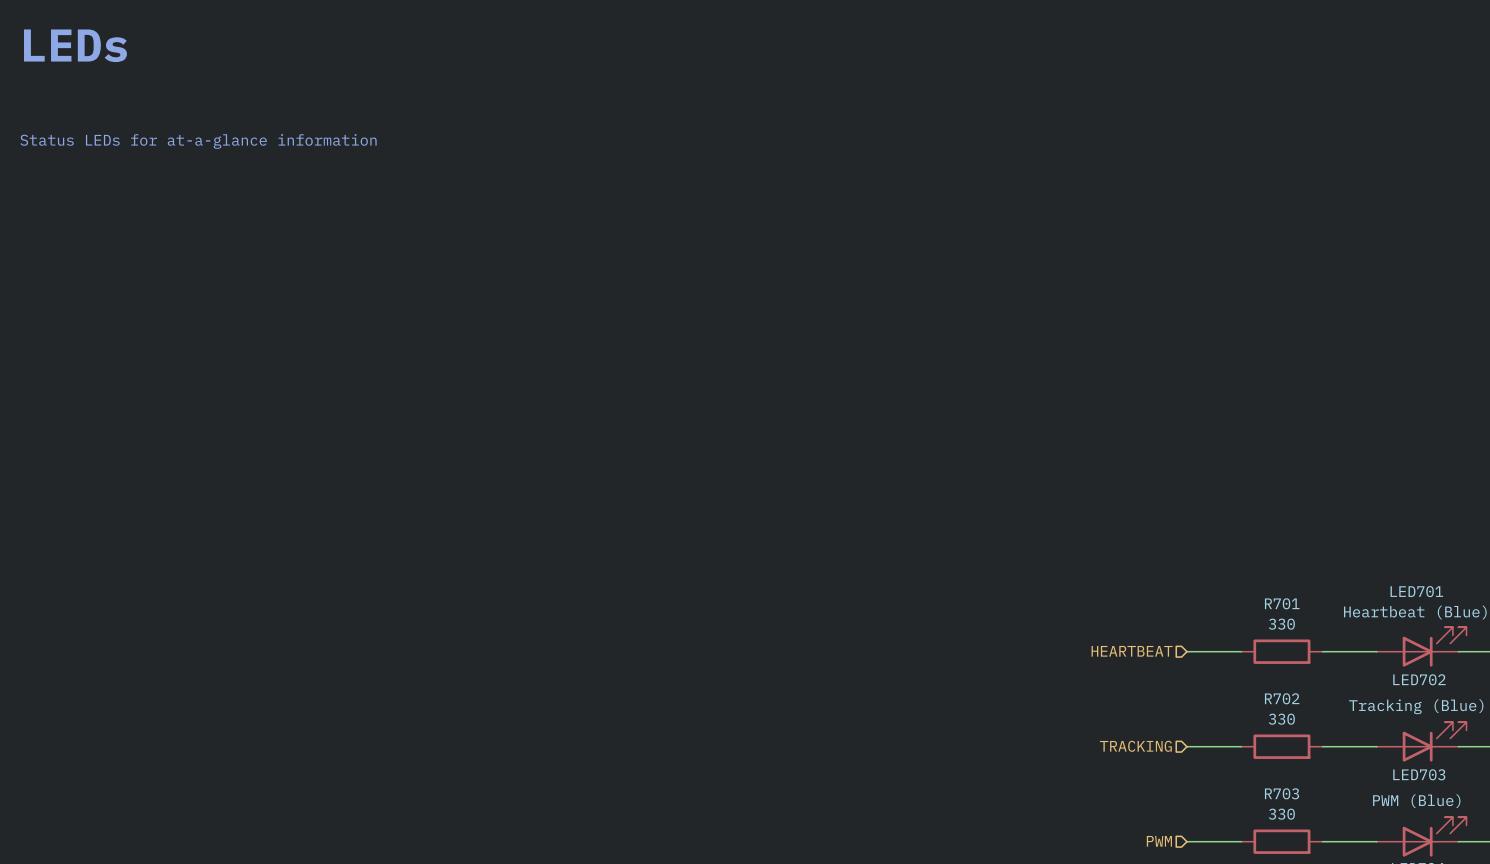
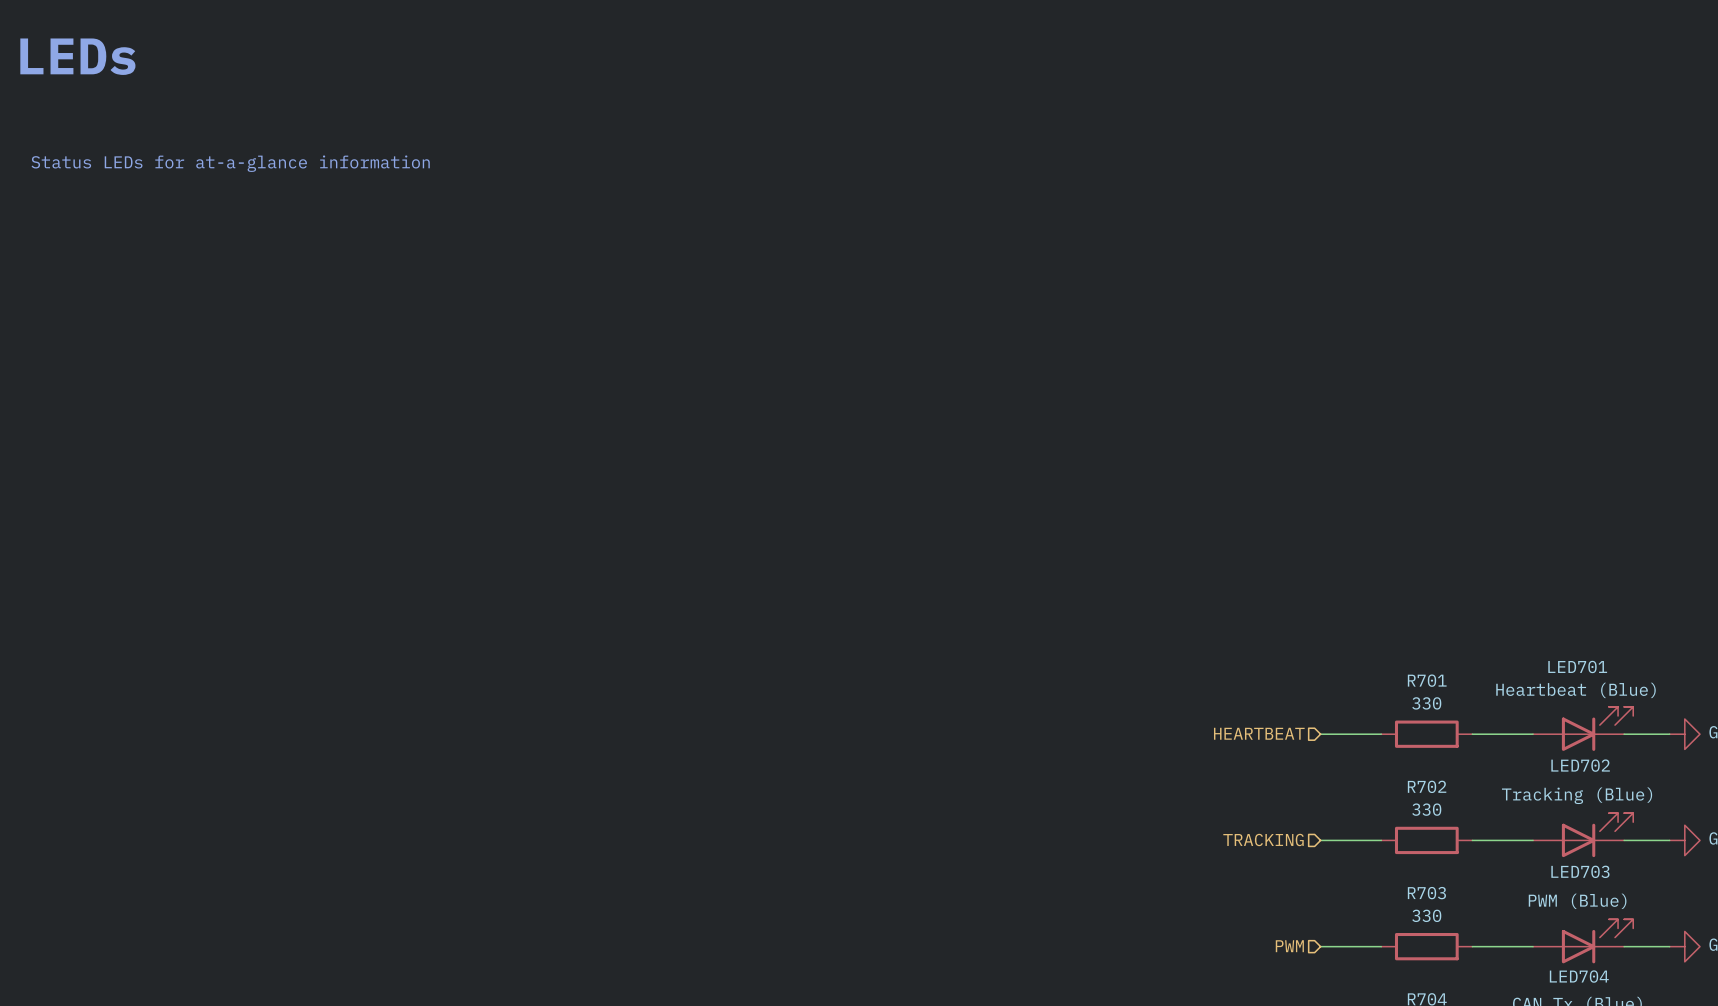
text position: Status LEDs for at-a-glance information (198, 141) -> Status LEDs for at-a-glance information (230, 163)

